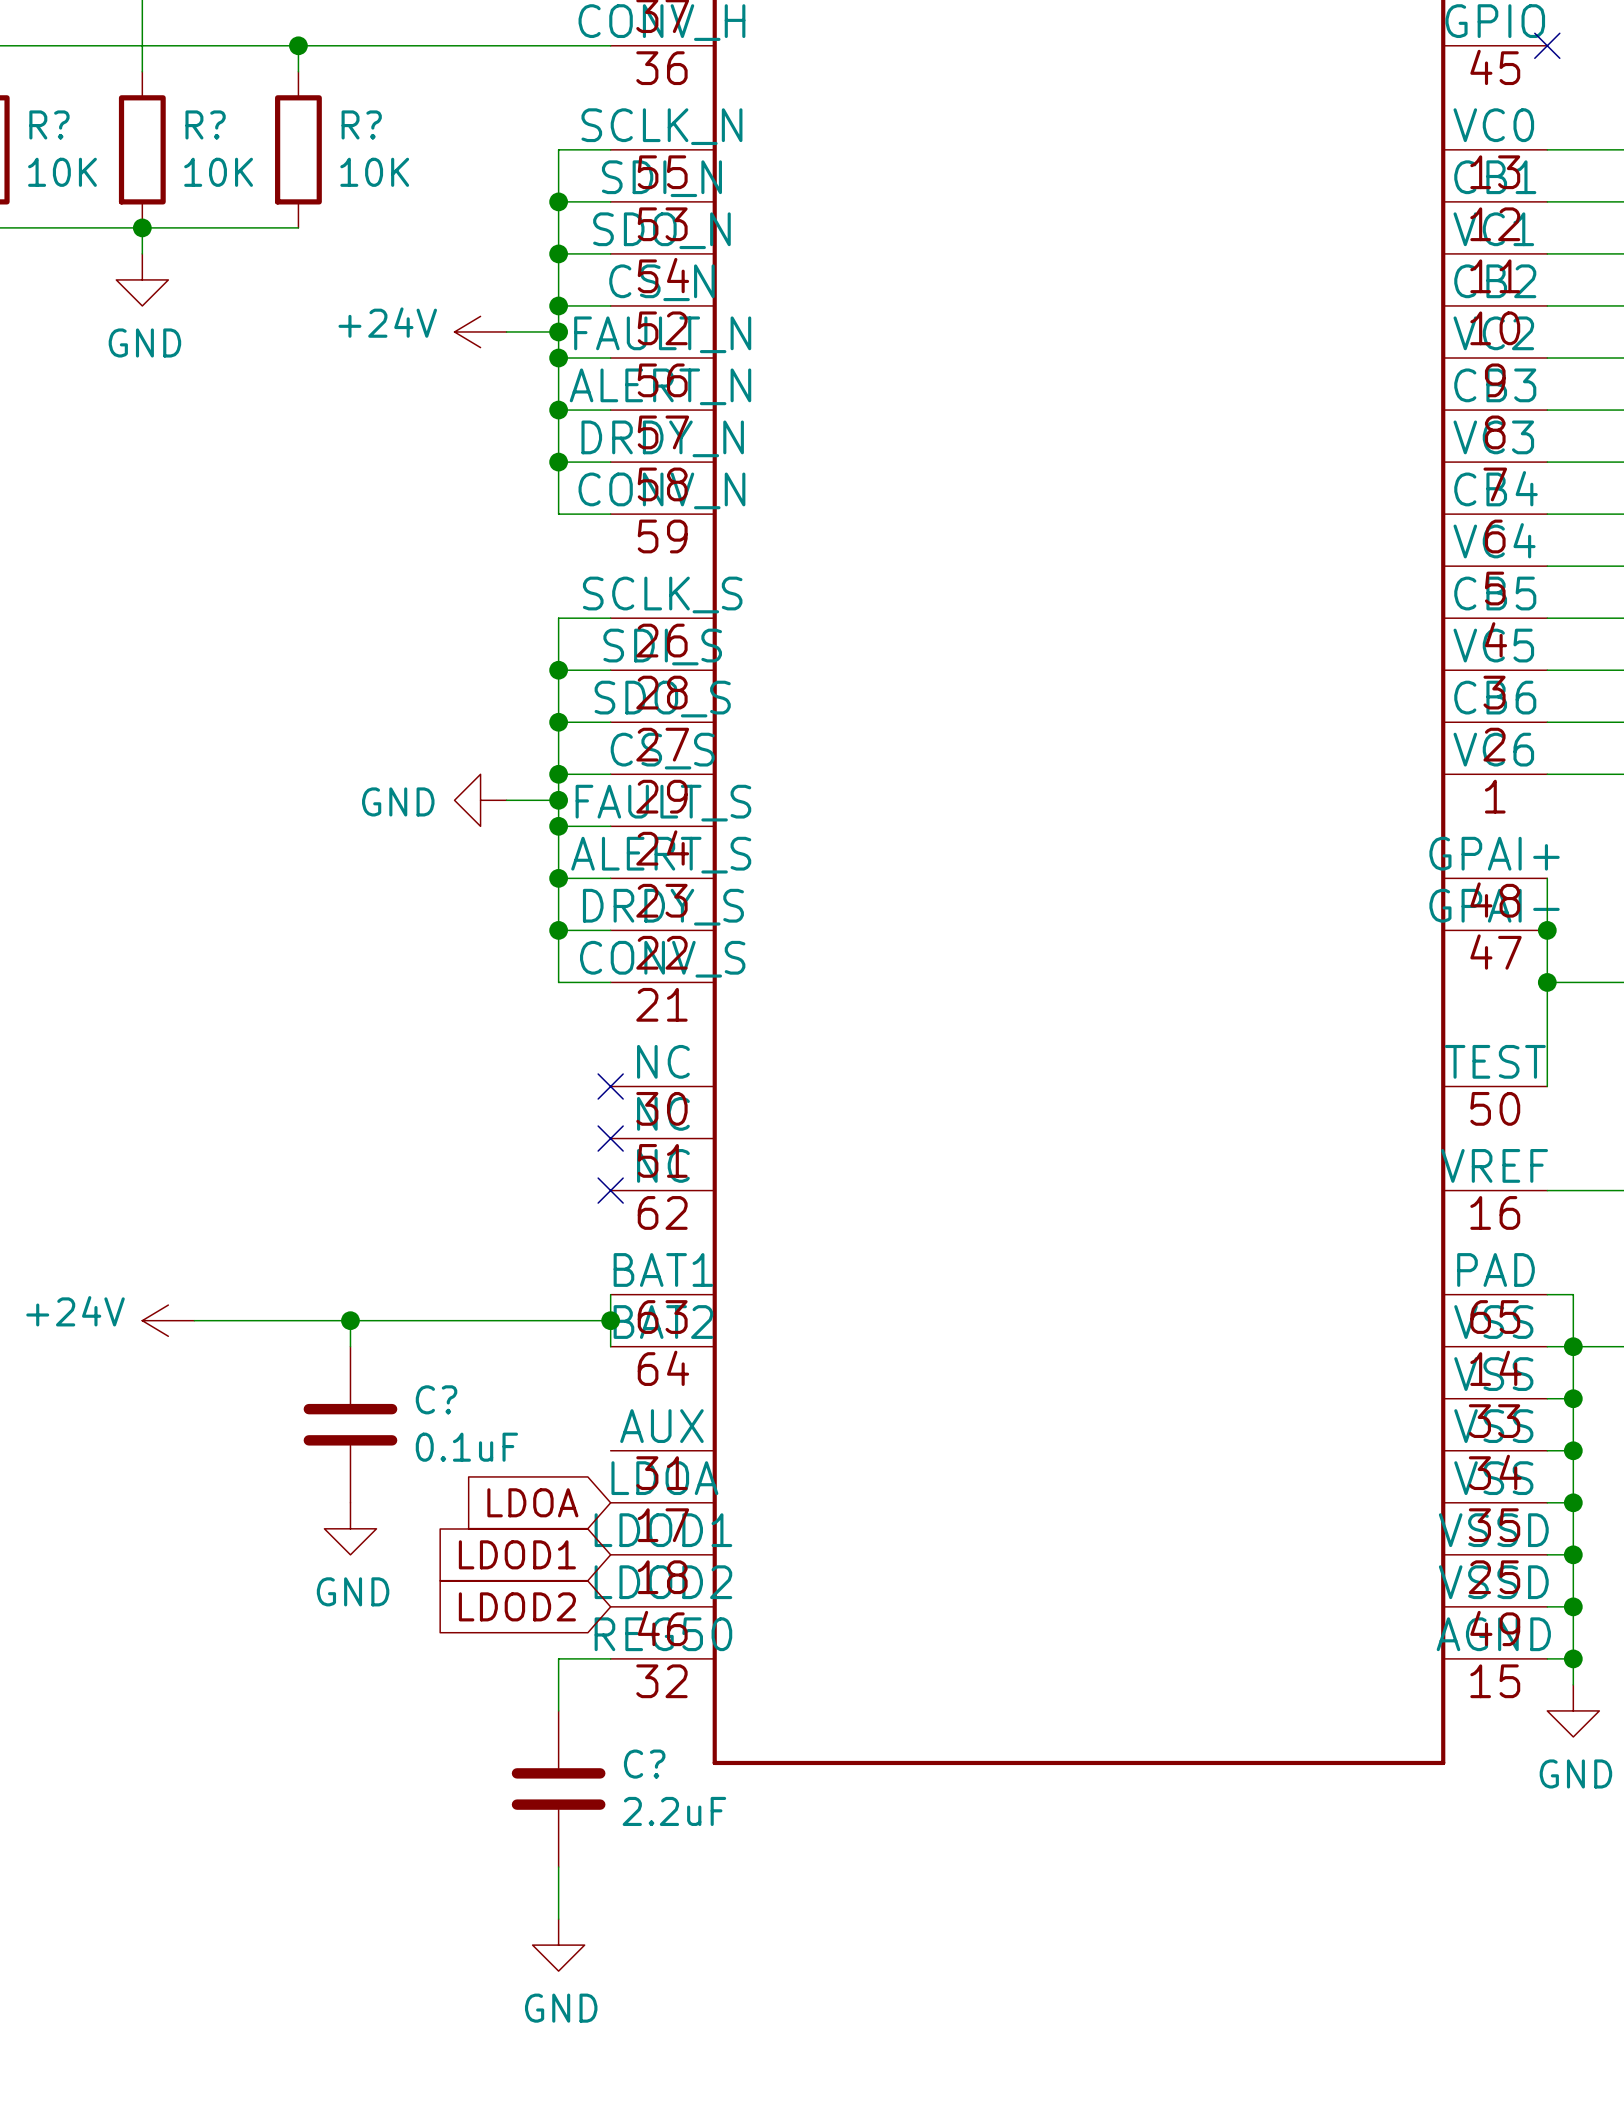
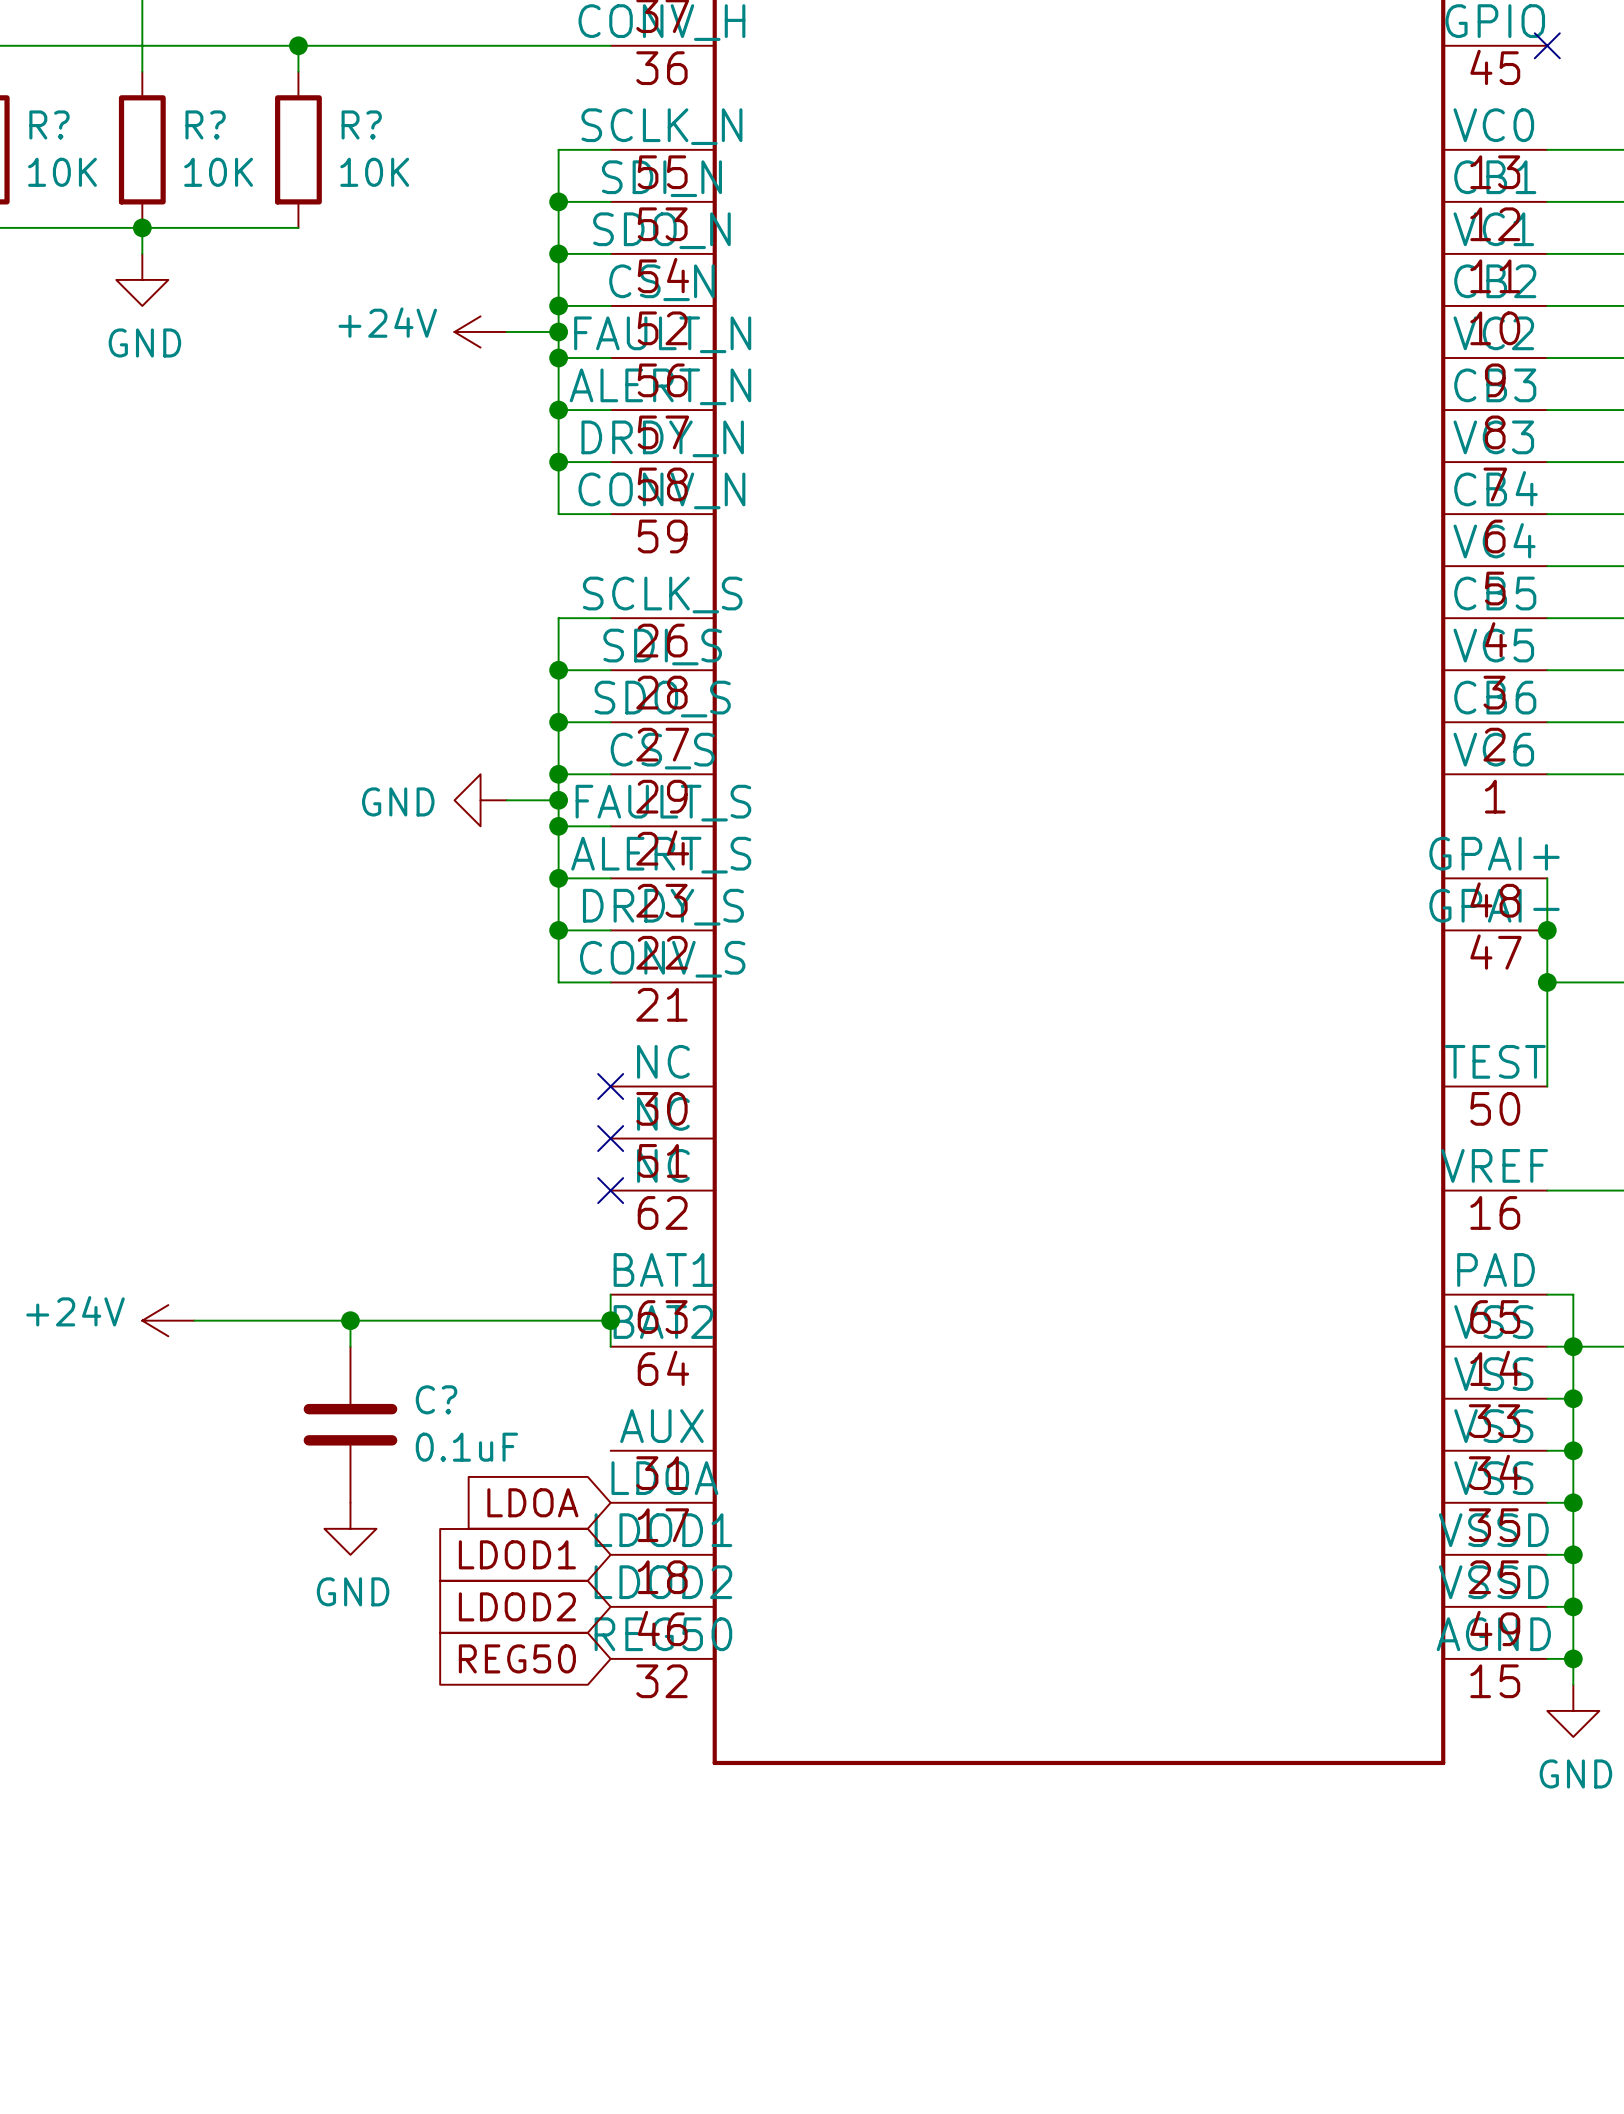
global label: none -> REG50 (517, 1658)
wire: (610, 1658) (558, 1658) (558, 1710) -> none
C?: 2.2uF (558, 1788) -> none
wire: (558, 1867) (558, 1919) -> none
power symbol: GND (558, 1945) -> none

